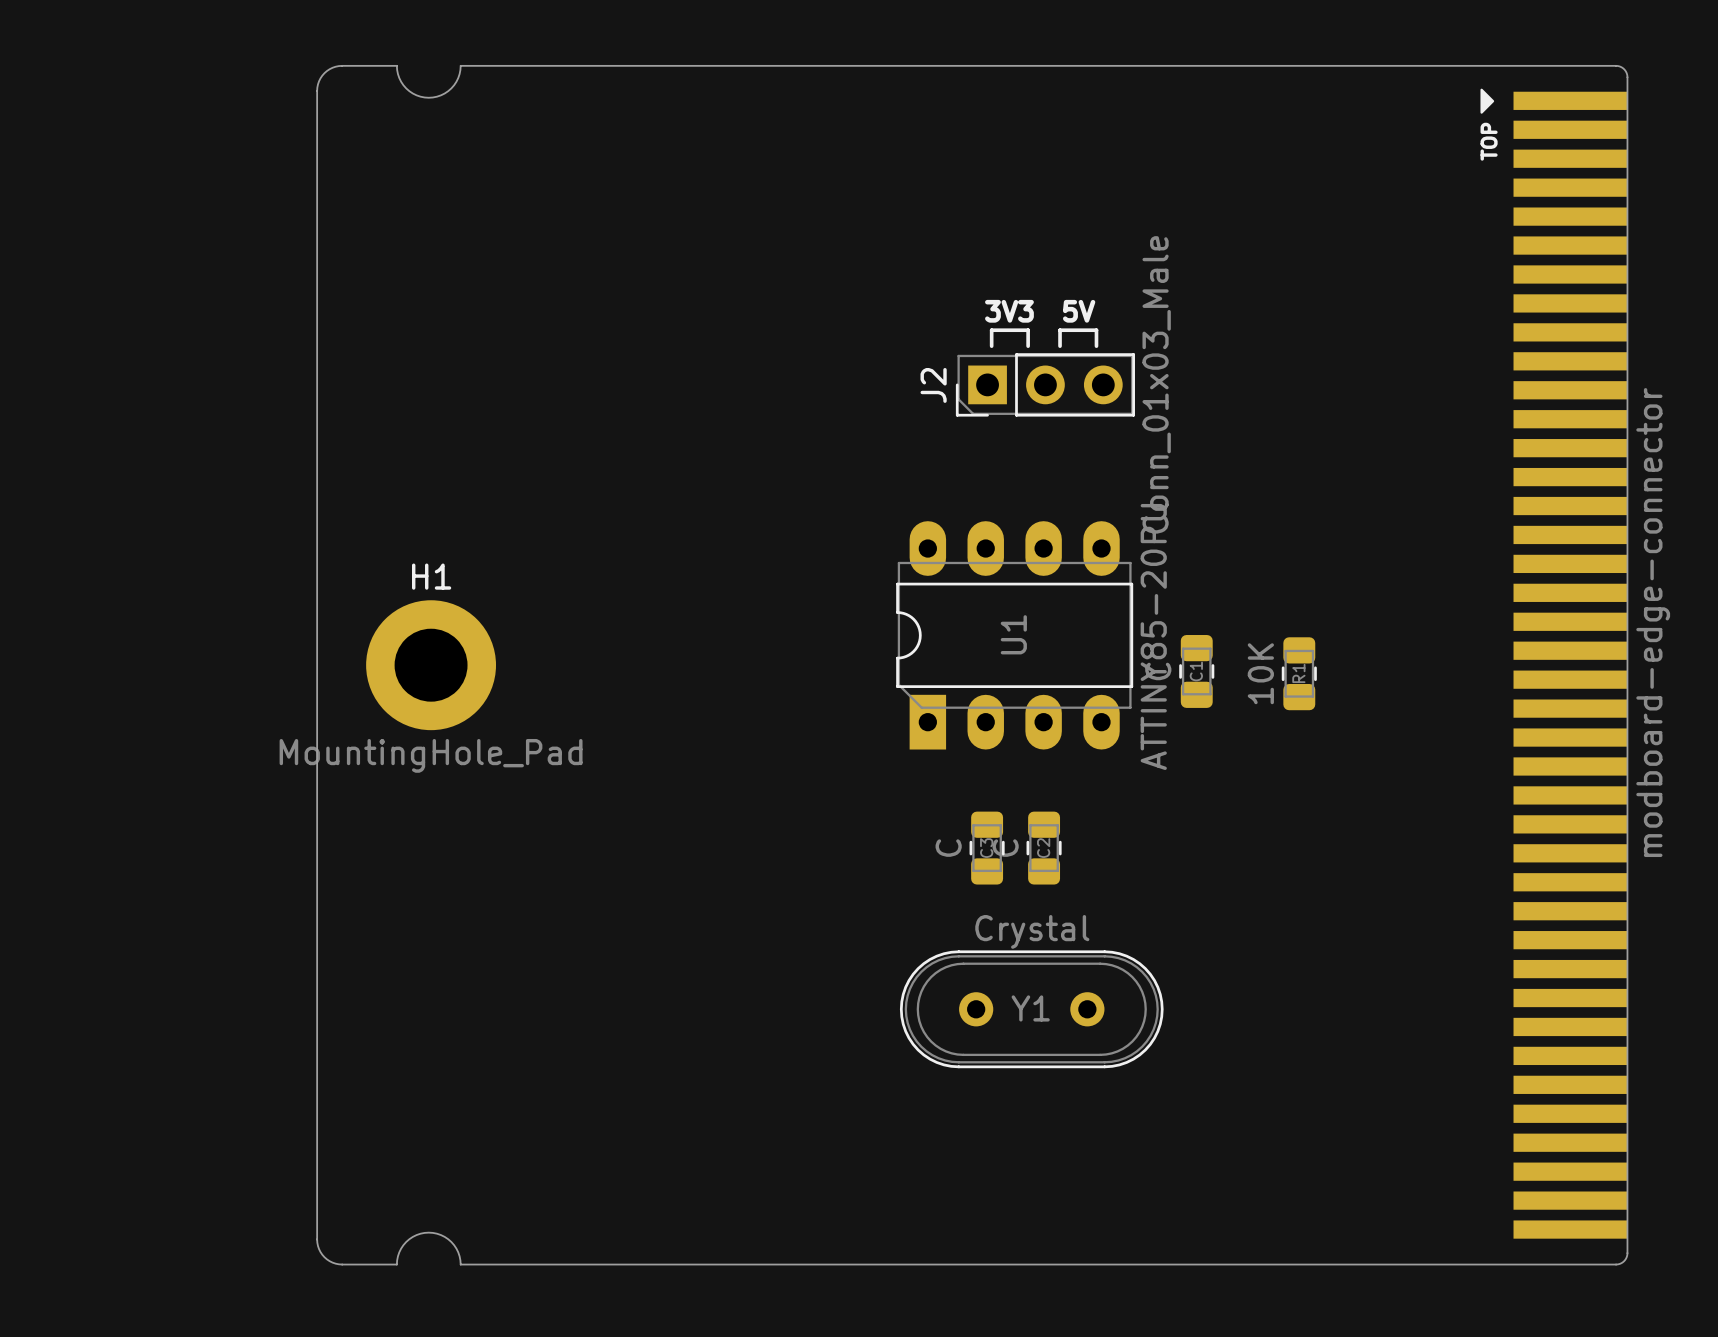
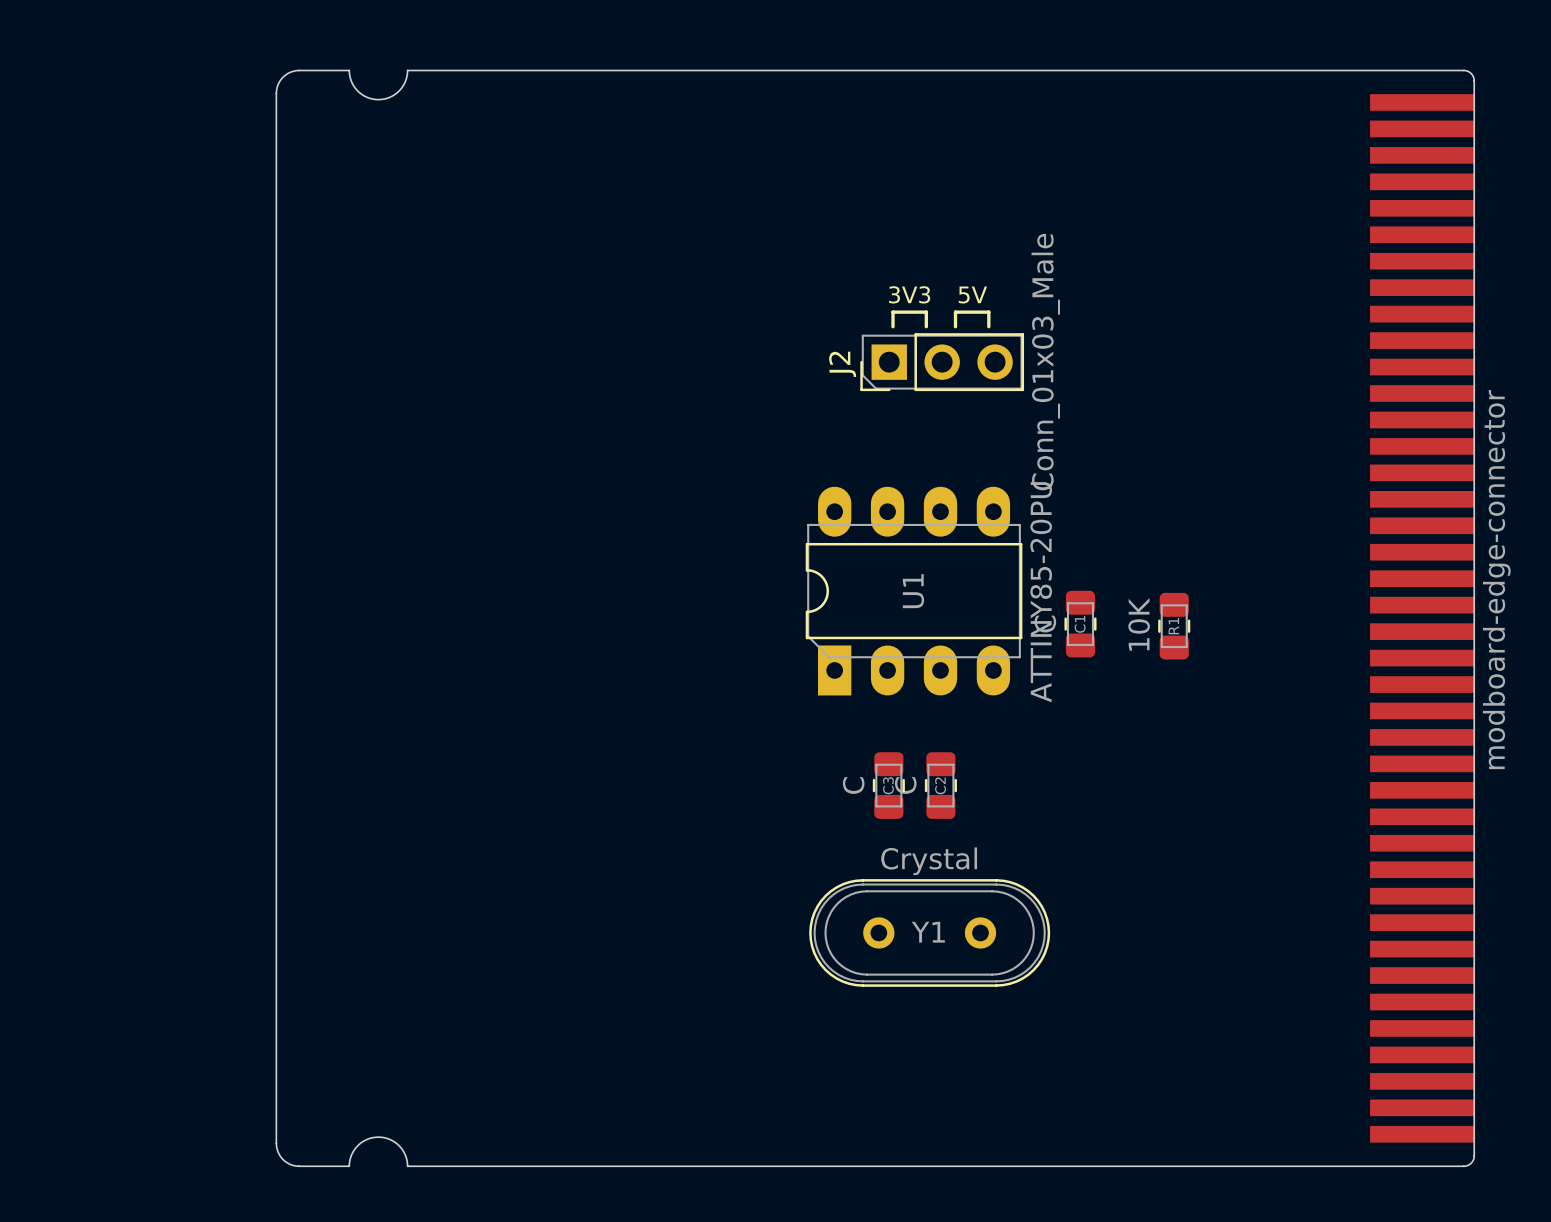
part footprint: [1480, 88, 1628, 1239] -> [1370, 94, 1475, 1143]
H1: MountingHole_Pad (431, 665) -> none

